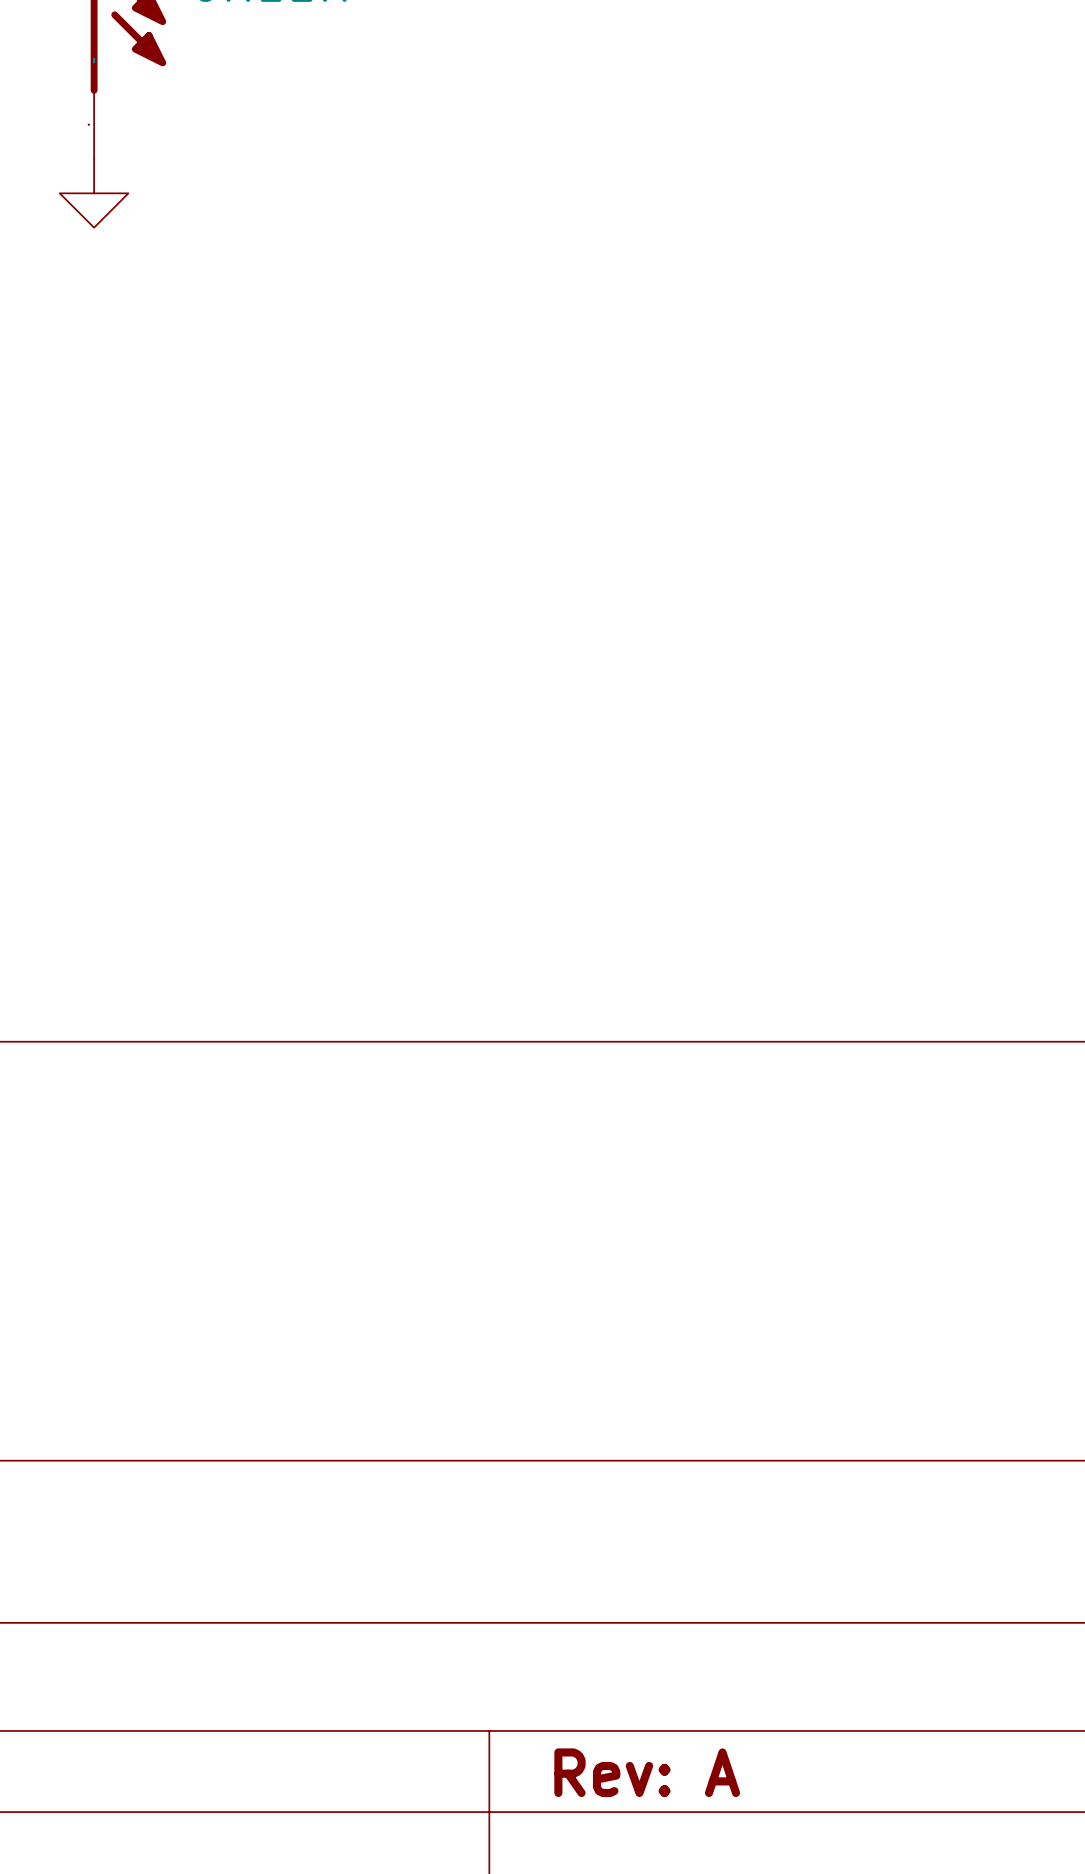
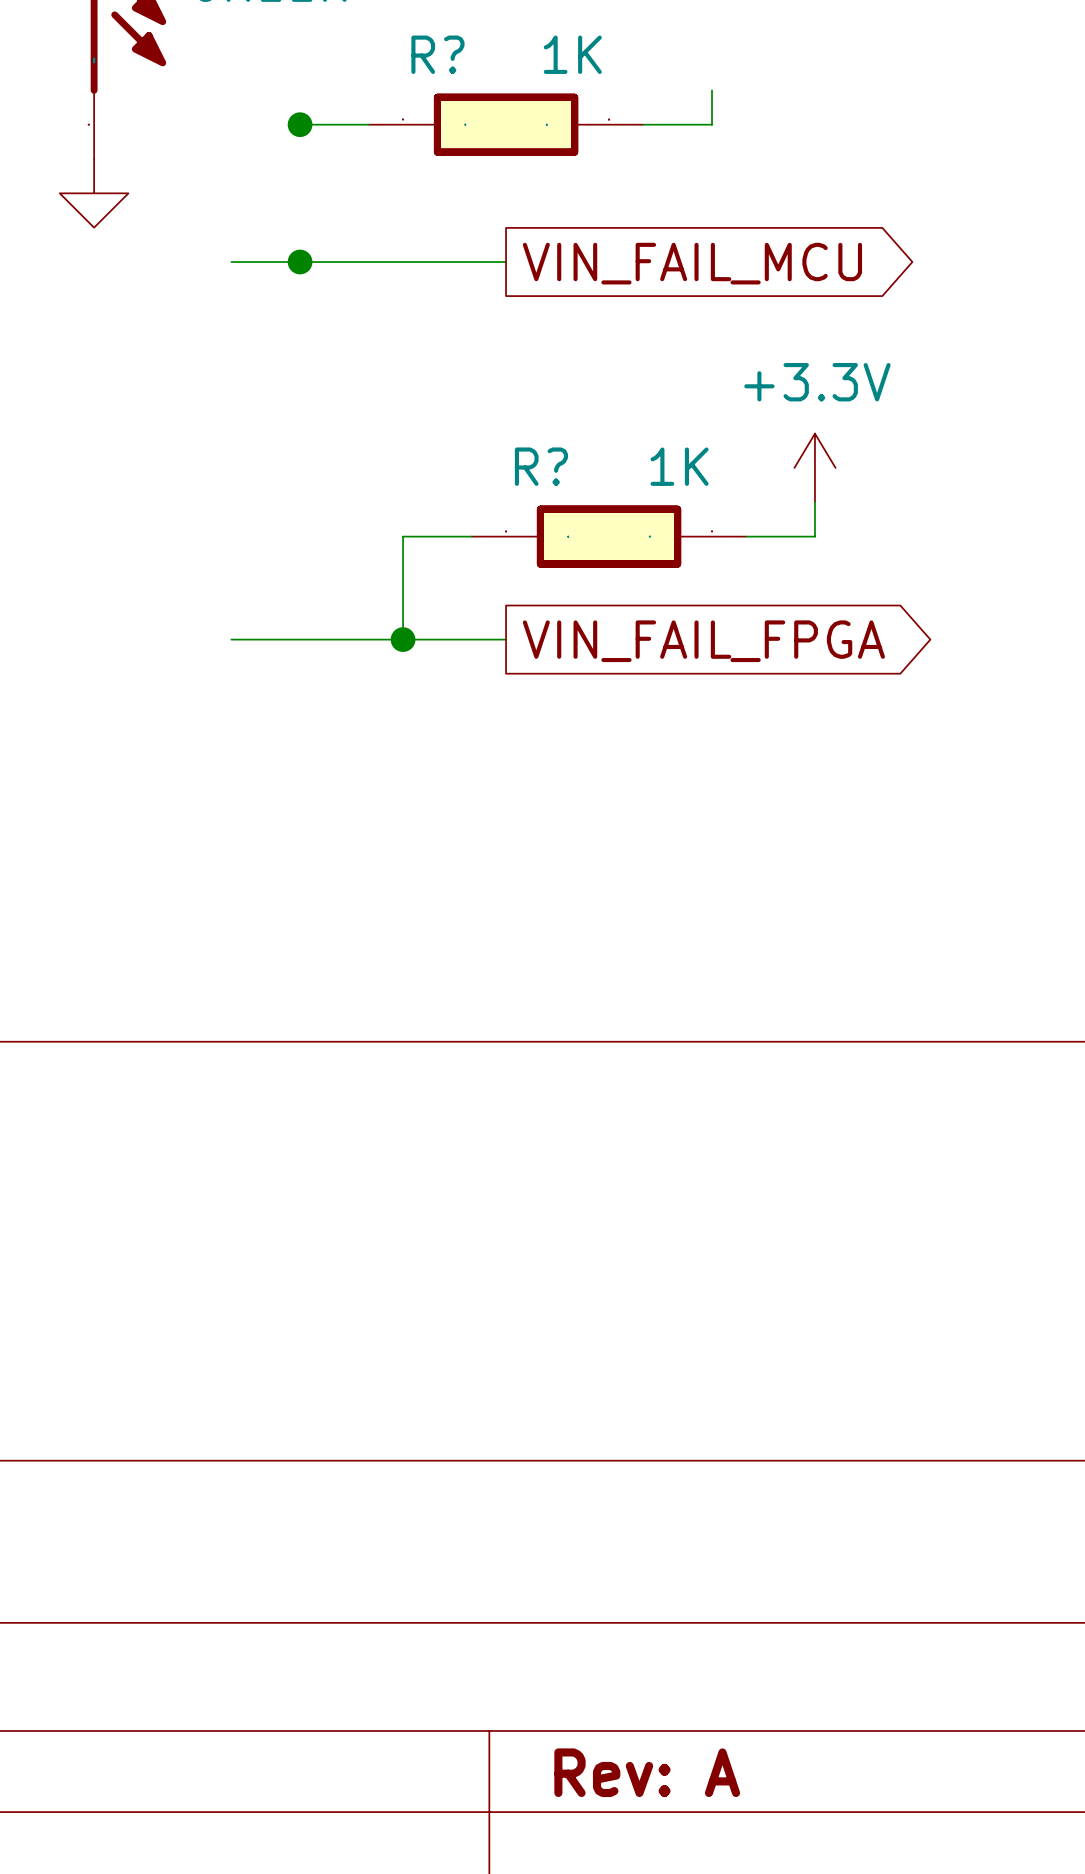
wire: none -> (712, 90) (712, 124) (643, 124)
wire: none -> (300, 124) (368, 124)
junction: none -> (300, 124)
R?: none -> (506, 124)
wire: none -> (231, 262) (506, 262)
junction: none -> (300, 262)
global label: none -> VIN_FAIL_MCU (692, 263)
power symbol: none -> +3.3V (814, 467)
wire: none -> (814, 502) (814, 536) (746, 536)
wire: none -> (471, 536) (403, 536) (403, 639)
R?: none -> (609, 536)
wire: none -> (231, 639) (506, 639)
junction: none -> (403, 639)
global label: none -> VIN_FAIL_FPGA (703, 641)

